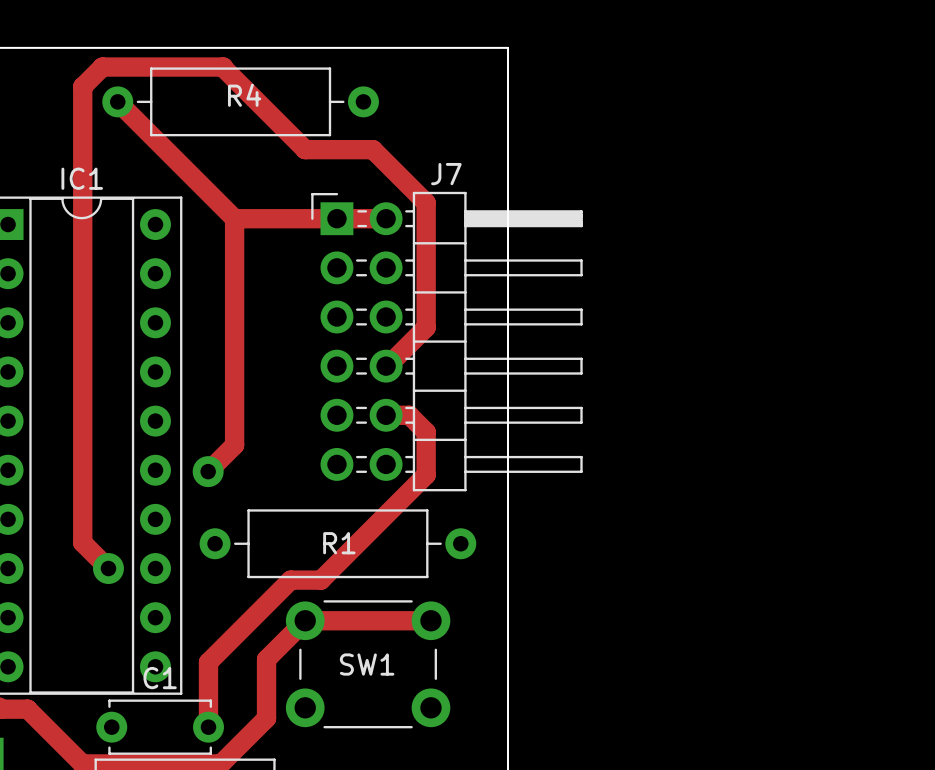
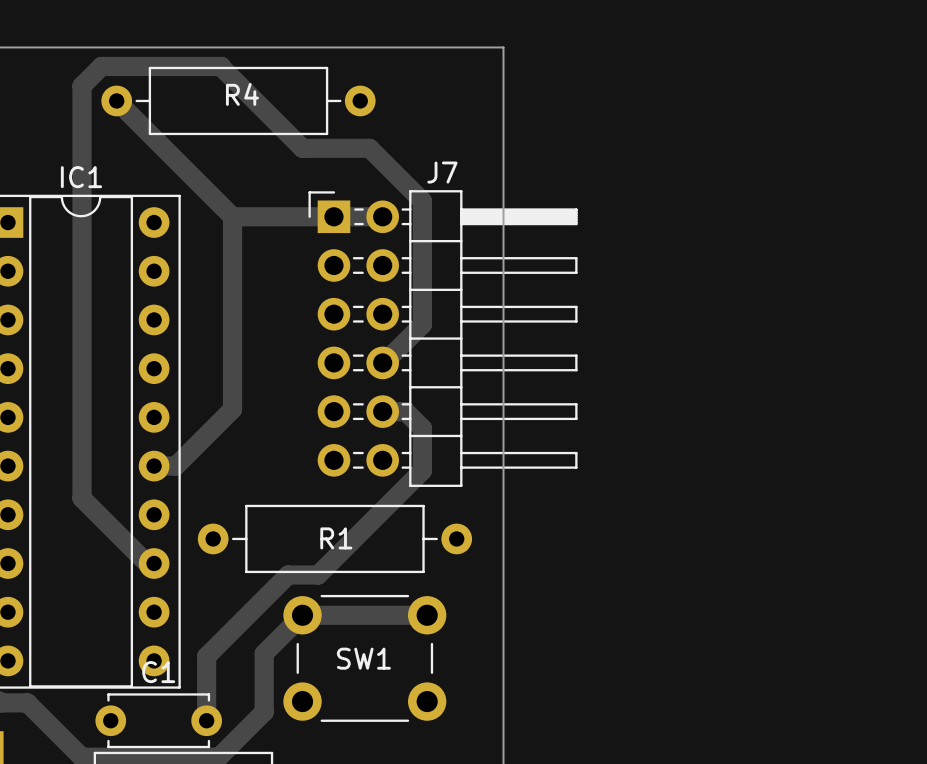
track: (234, 412) (234, 445) (208, 471) -> (232, 409) (175, 466) (154, 466)
via: (208, 471) -> none
track: (82, 502) (82, 542) (108, 568) -> (82, 498) (147, 563) (154, 563)
via: (108, 568) -> none

